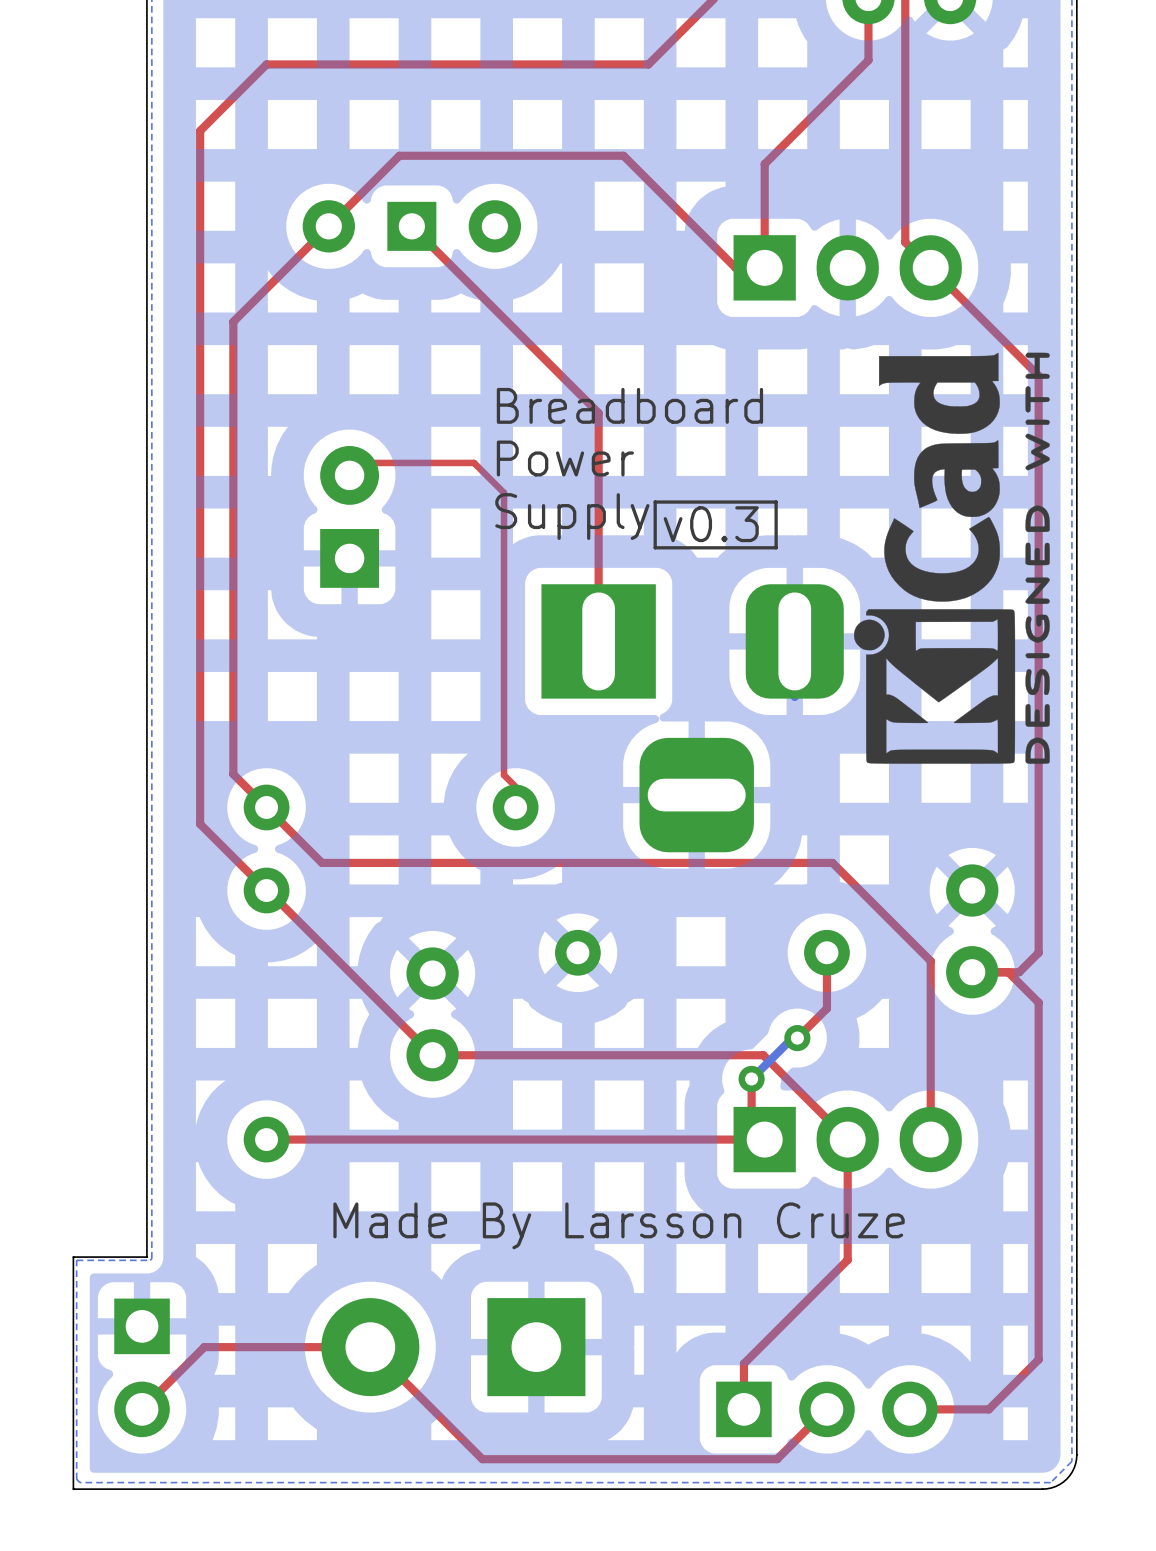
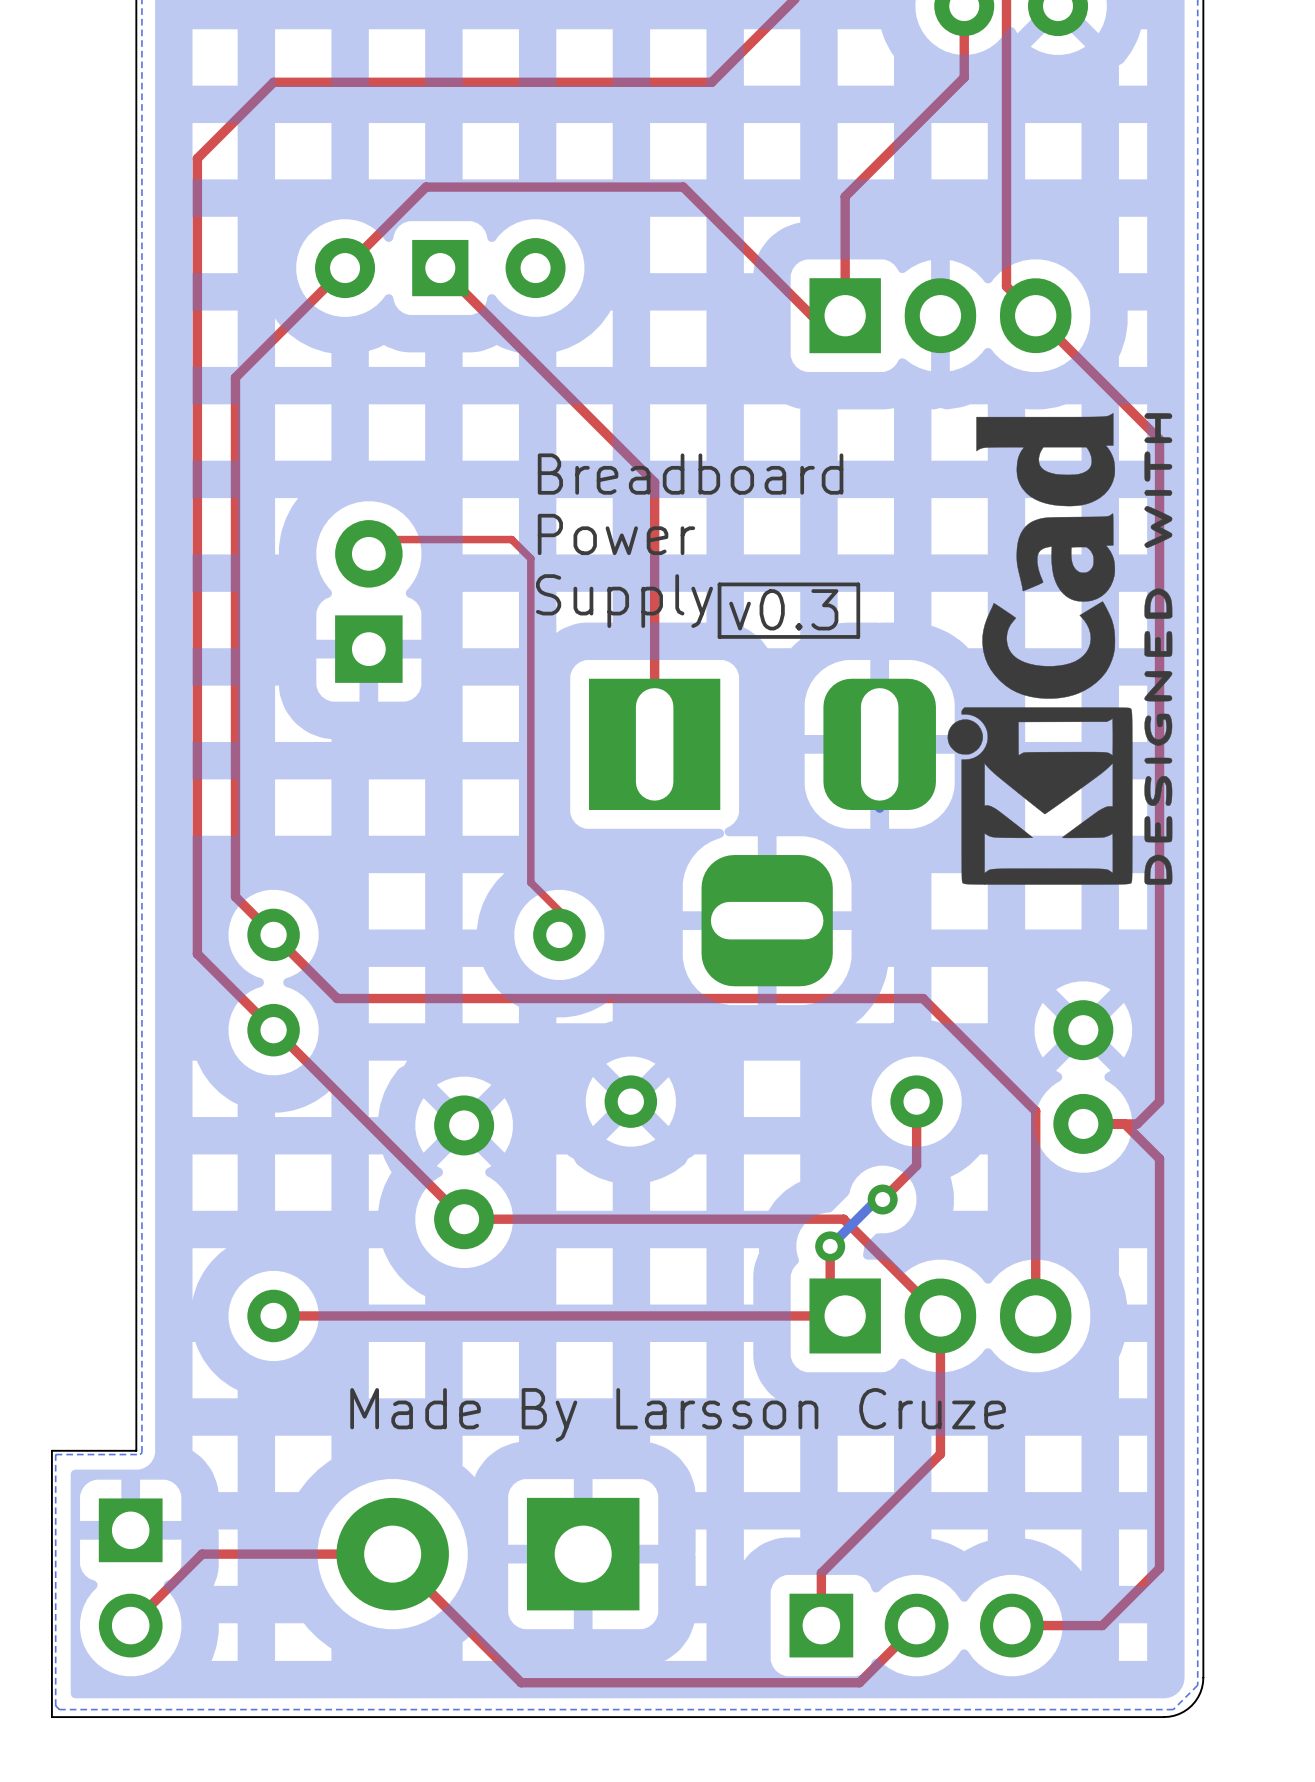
top track: (490, 479) (504, 492) (504, 775) -> (530, 558) (530, 882) (546, 897)

